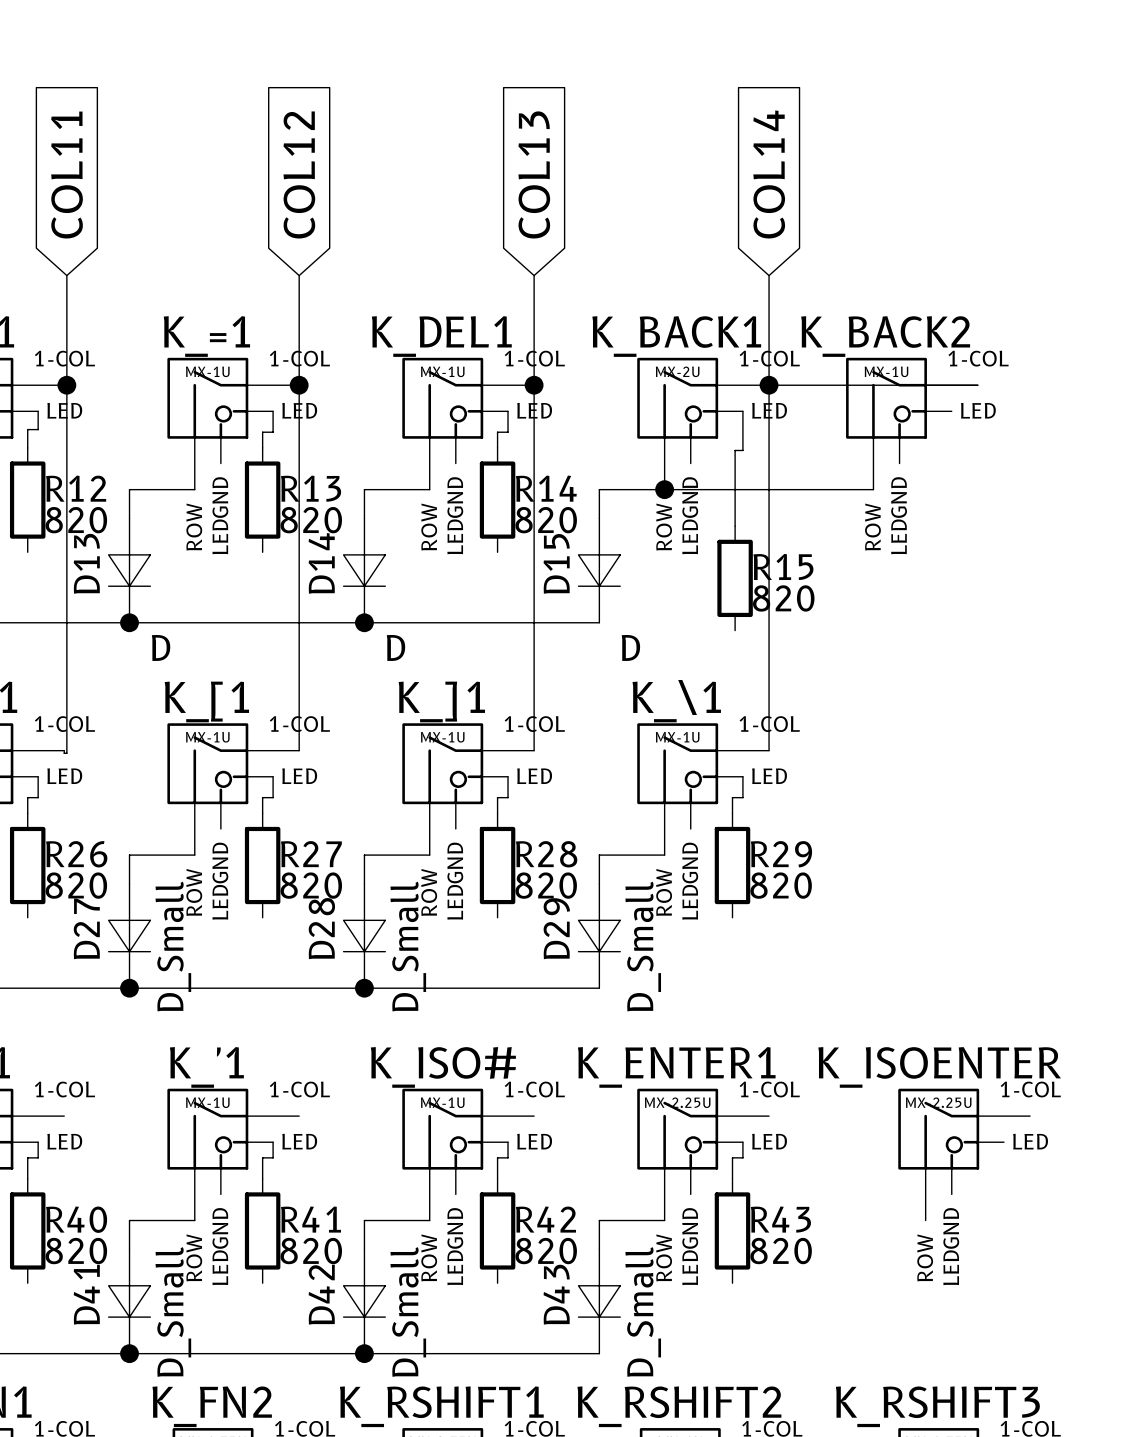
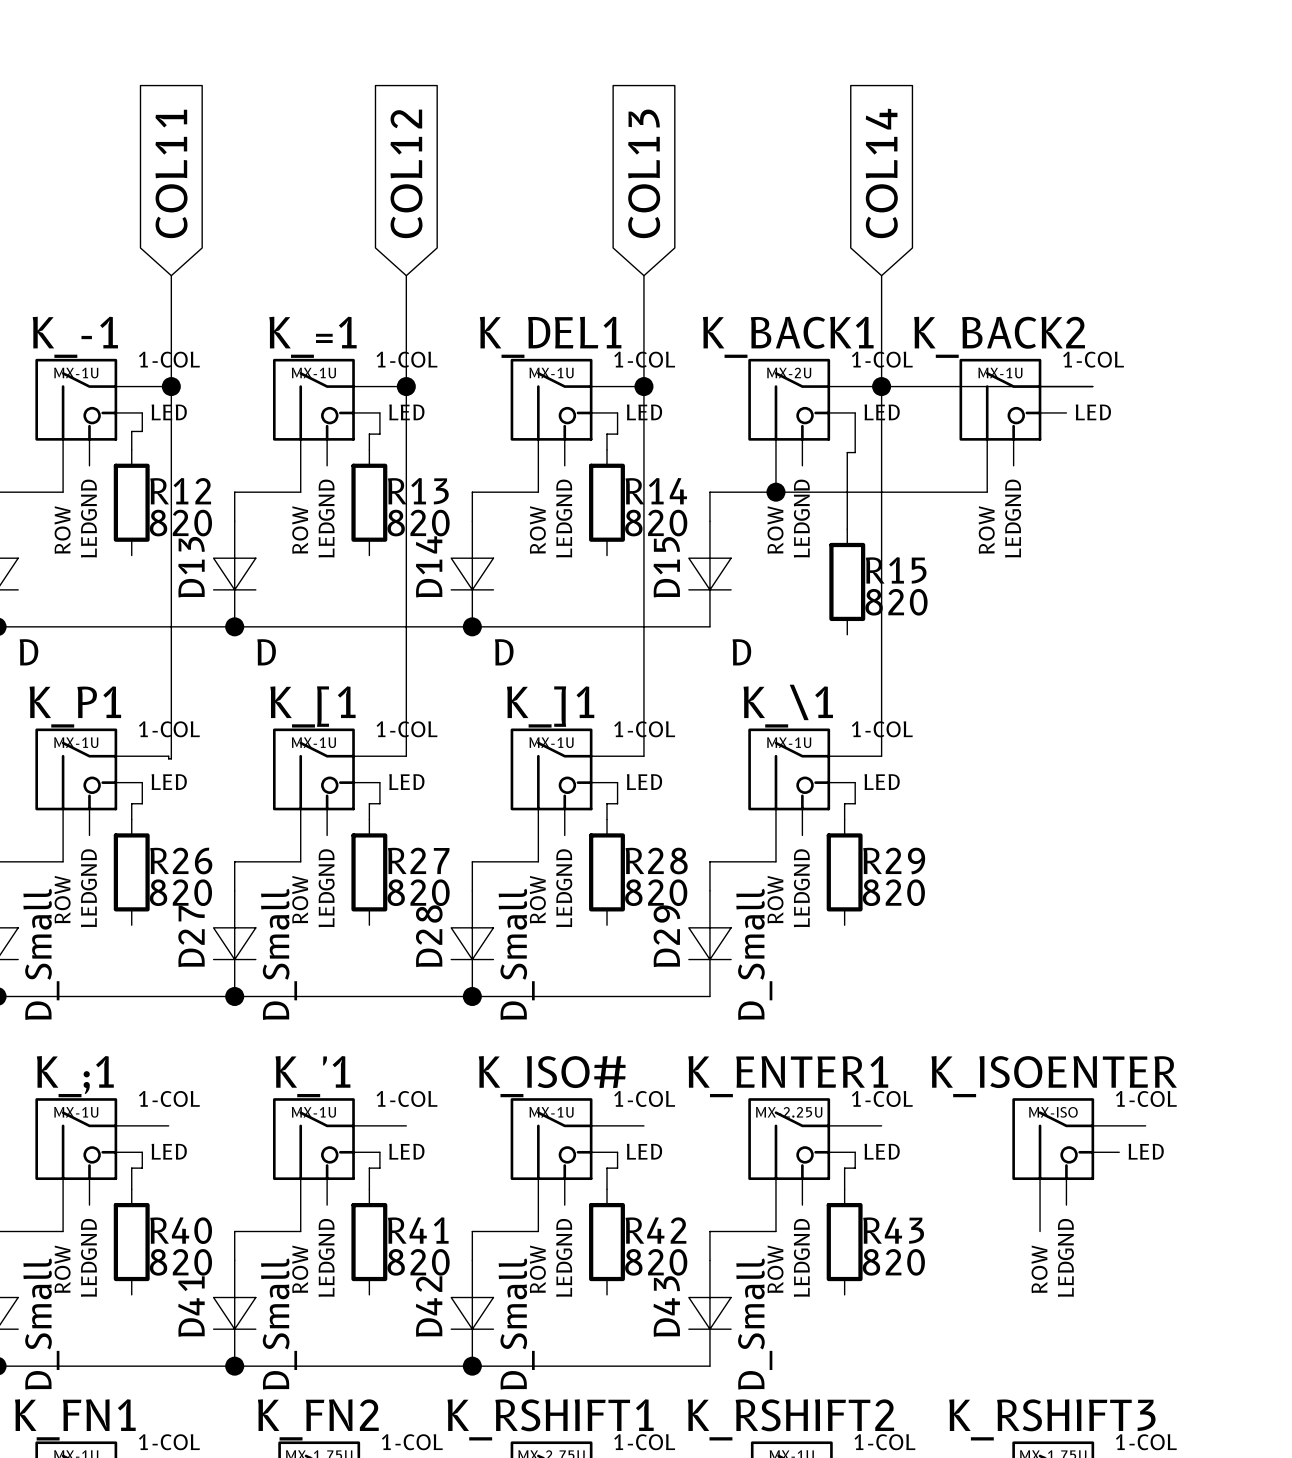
K_ISOENTER value: MX-2.25U (938, 1102) -> MX-ISO (1053, 1112)

